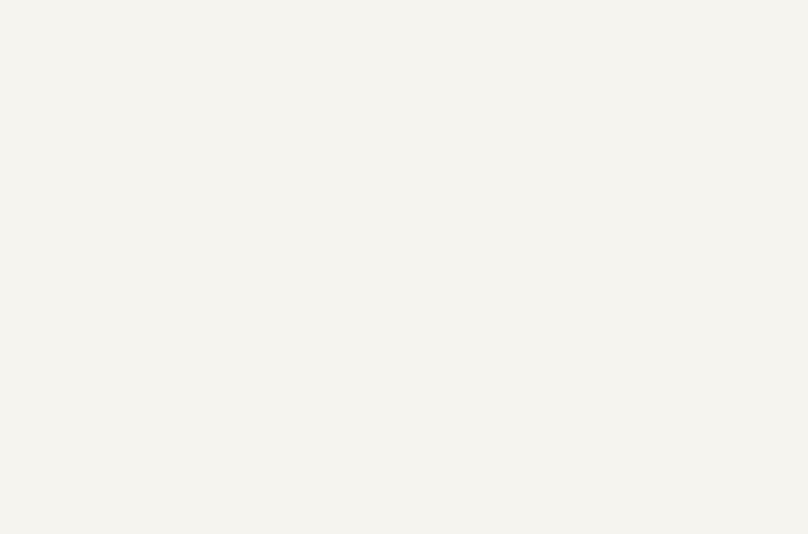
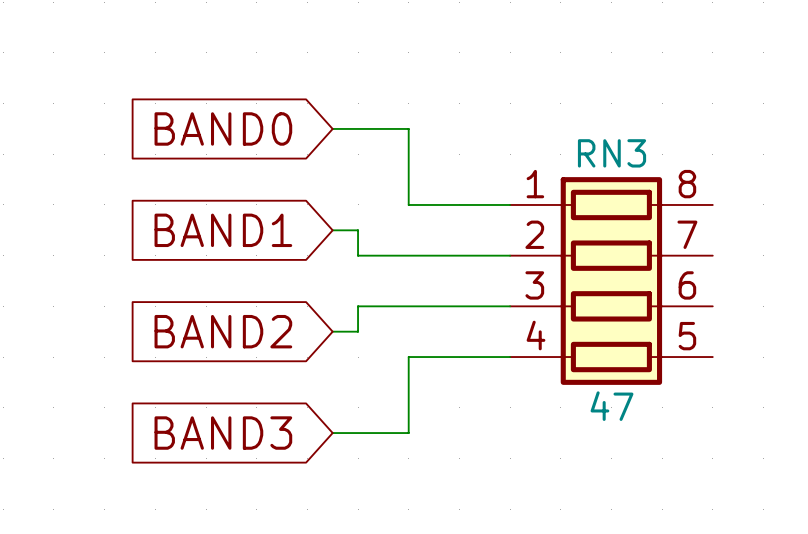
wire: none -> (332, 128) (408, 128) (408, 204) (510, 204)
global label: none -> BAND0 (223, 128)
global label: none -> BAND1 (223, 230)
wire: none -> (332, 230) (358, 230) (358, 255) (510, 255)
RN3: none -> 47 (611, 281)
wire: none -> (510, 306) (358, 306) (358, 331) (332, 331)
global label: none -> BAND2 (223, 331)
wire: none -> (510, 357) (408, 357) (408, 433) (332, 433)
global label: none -> BAND3 (223, 433)

